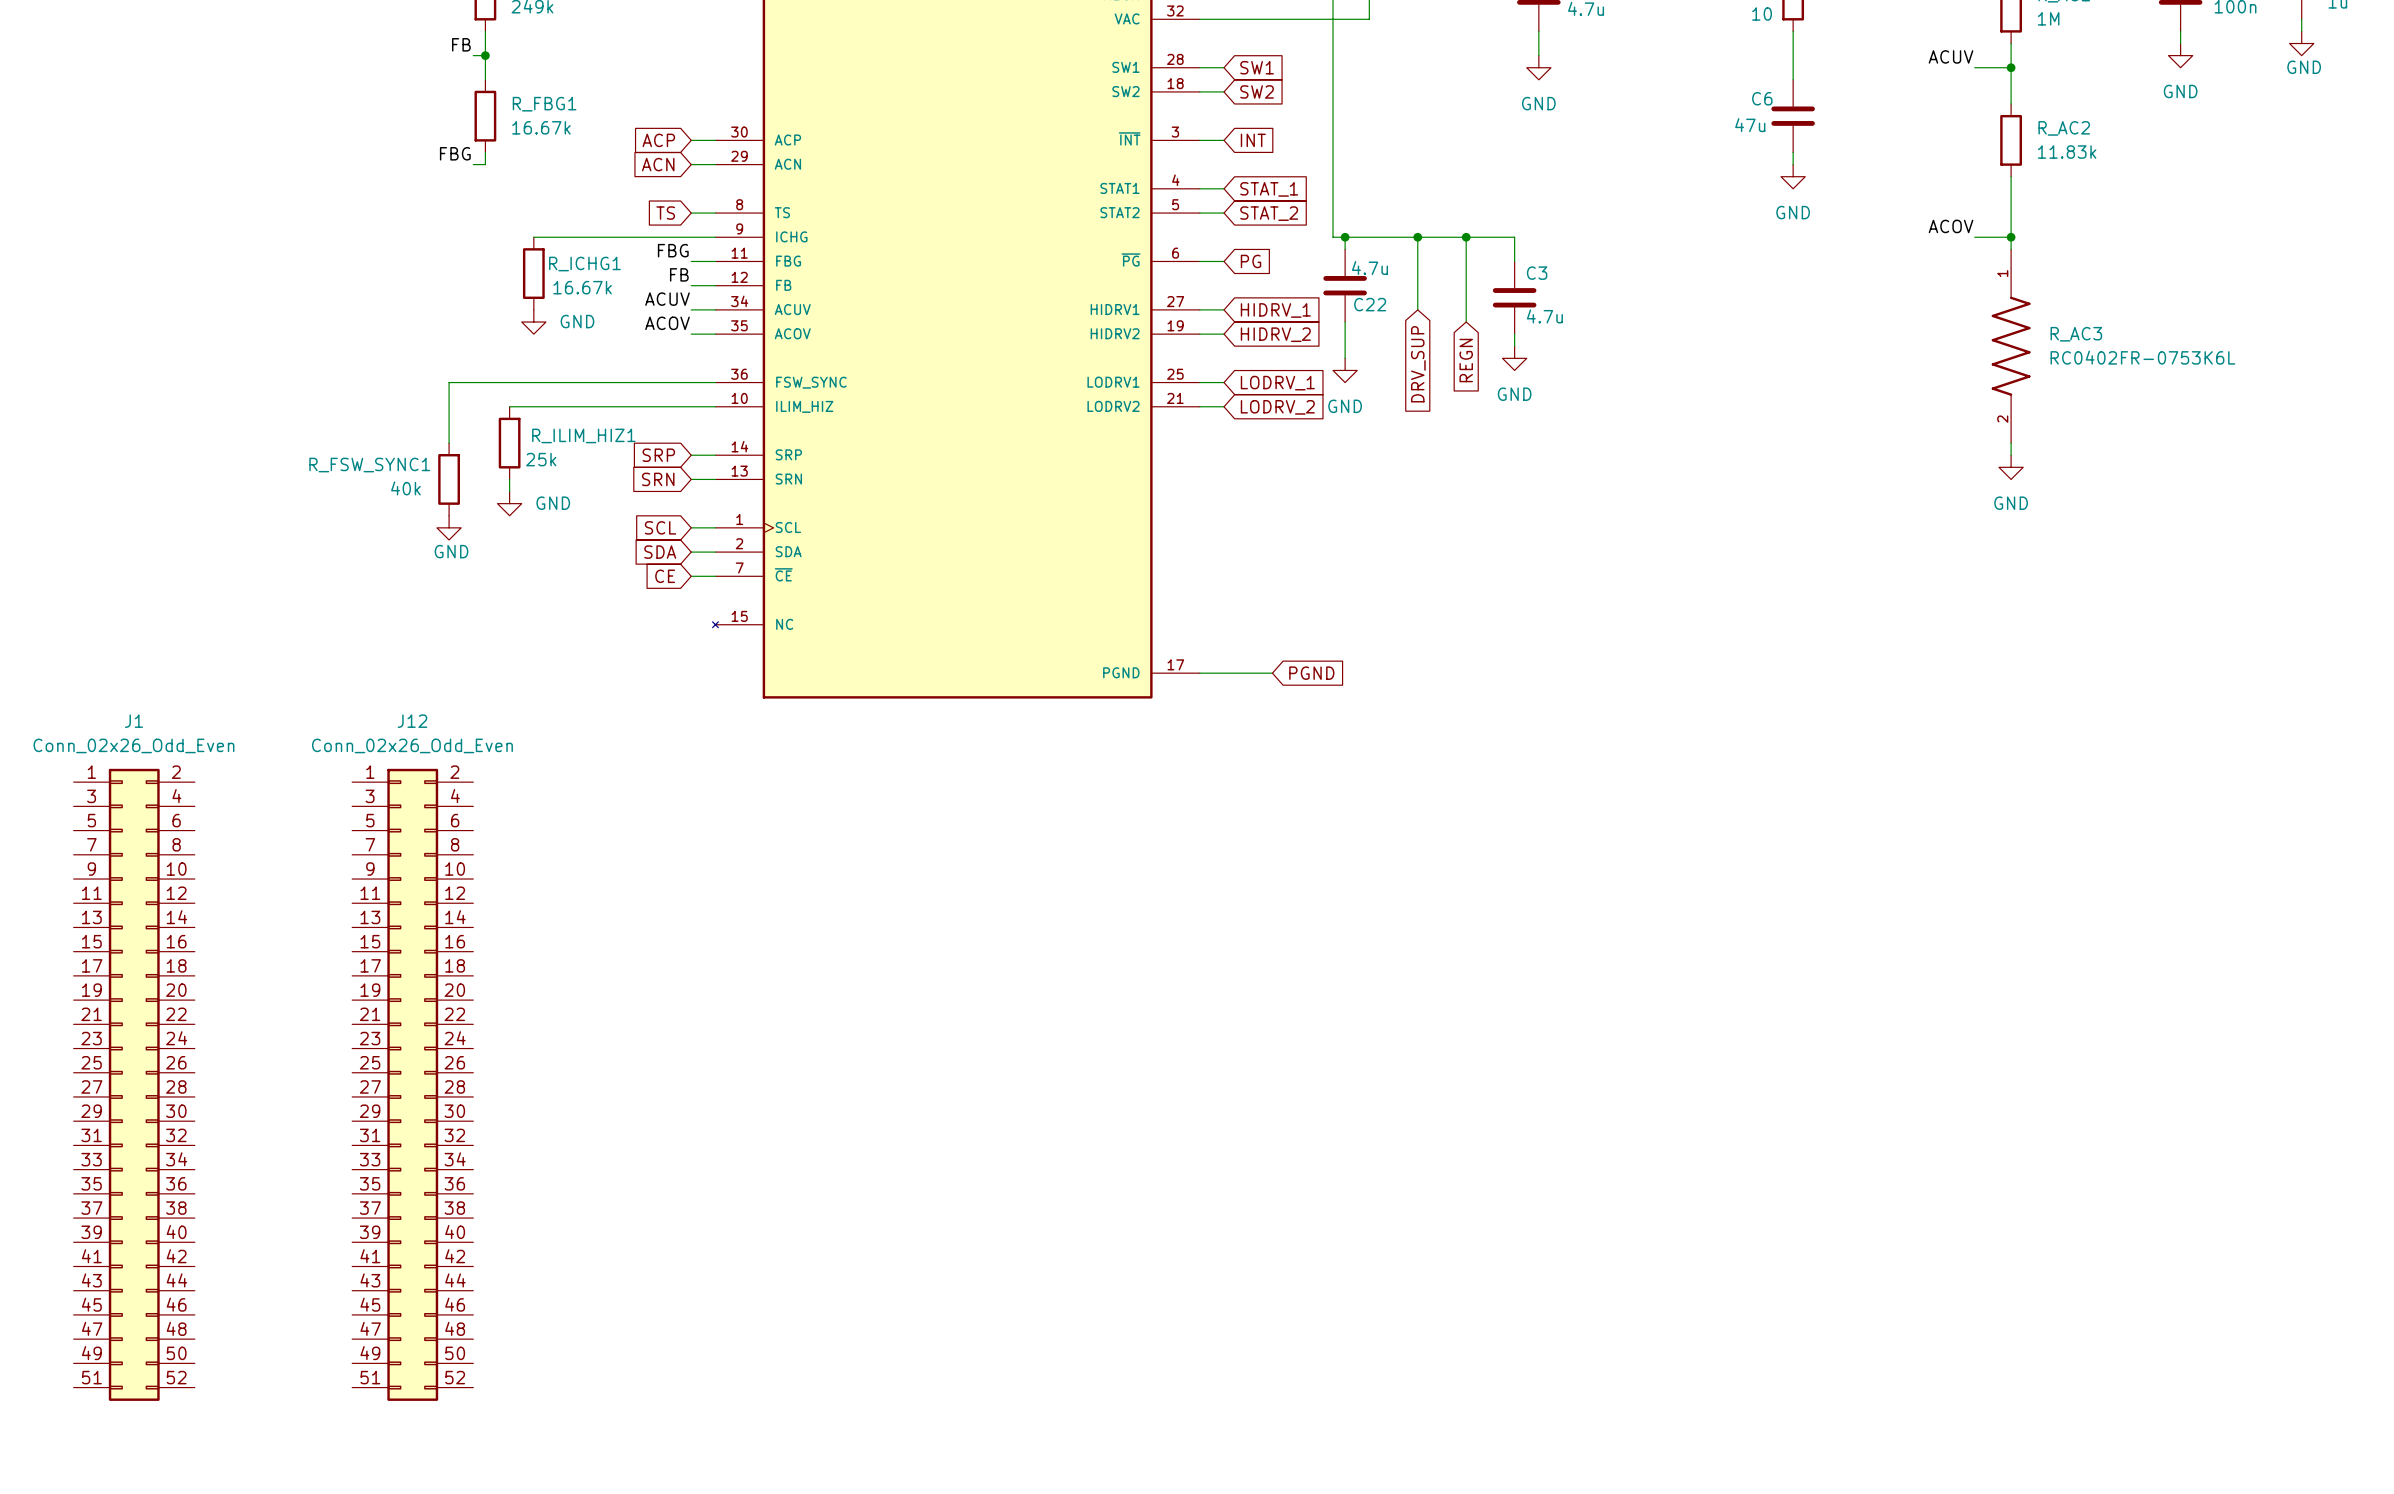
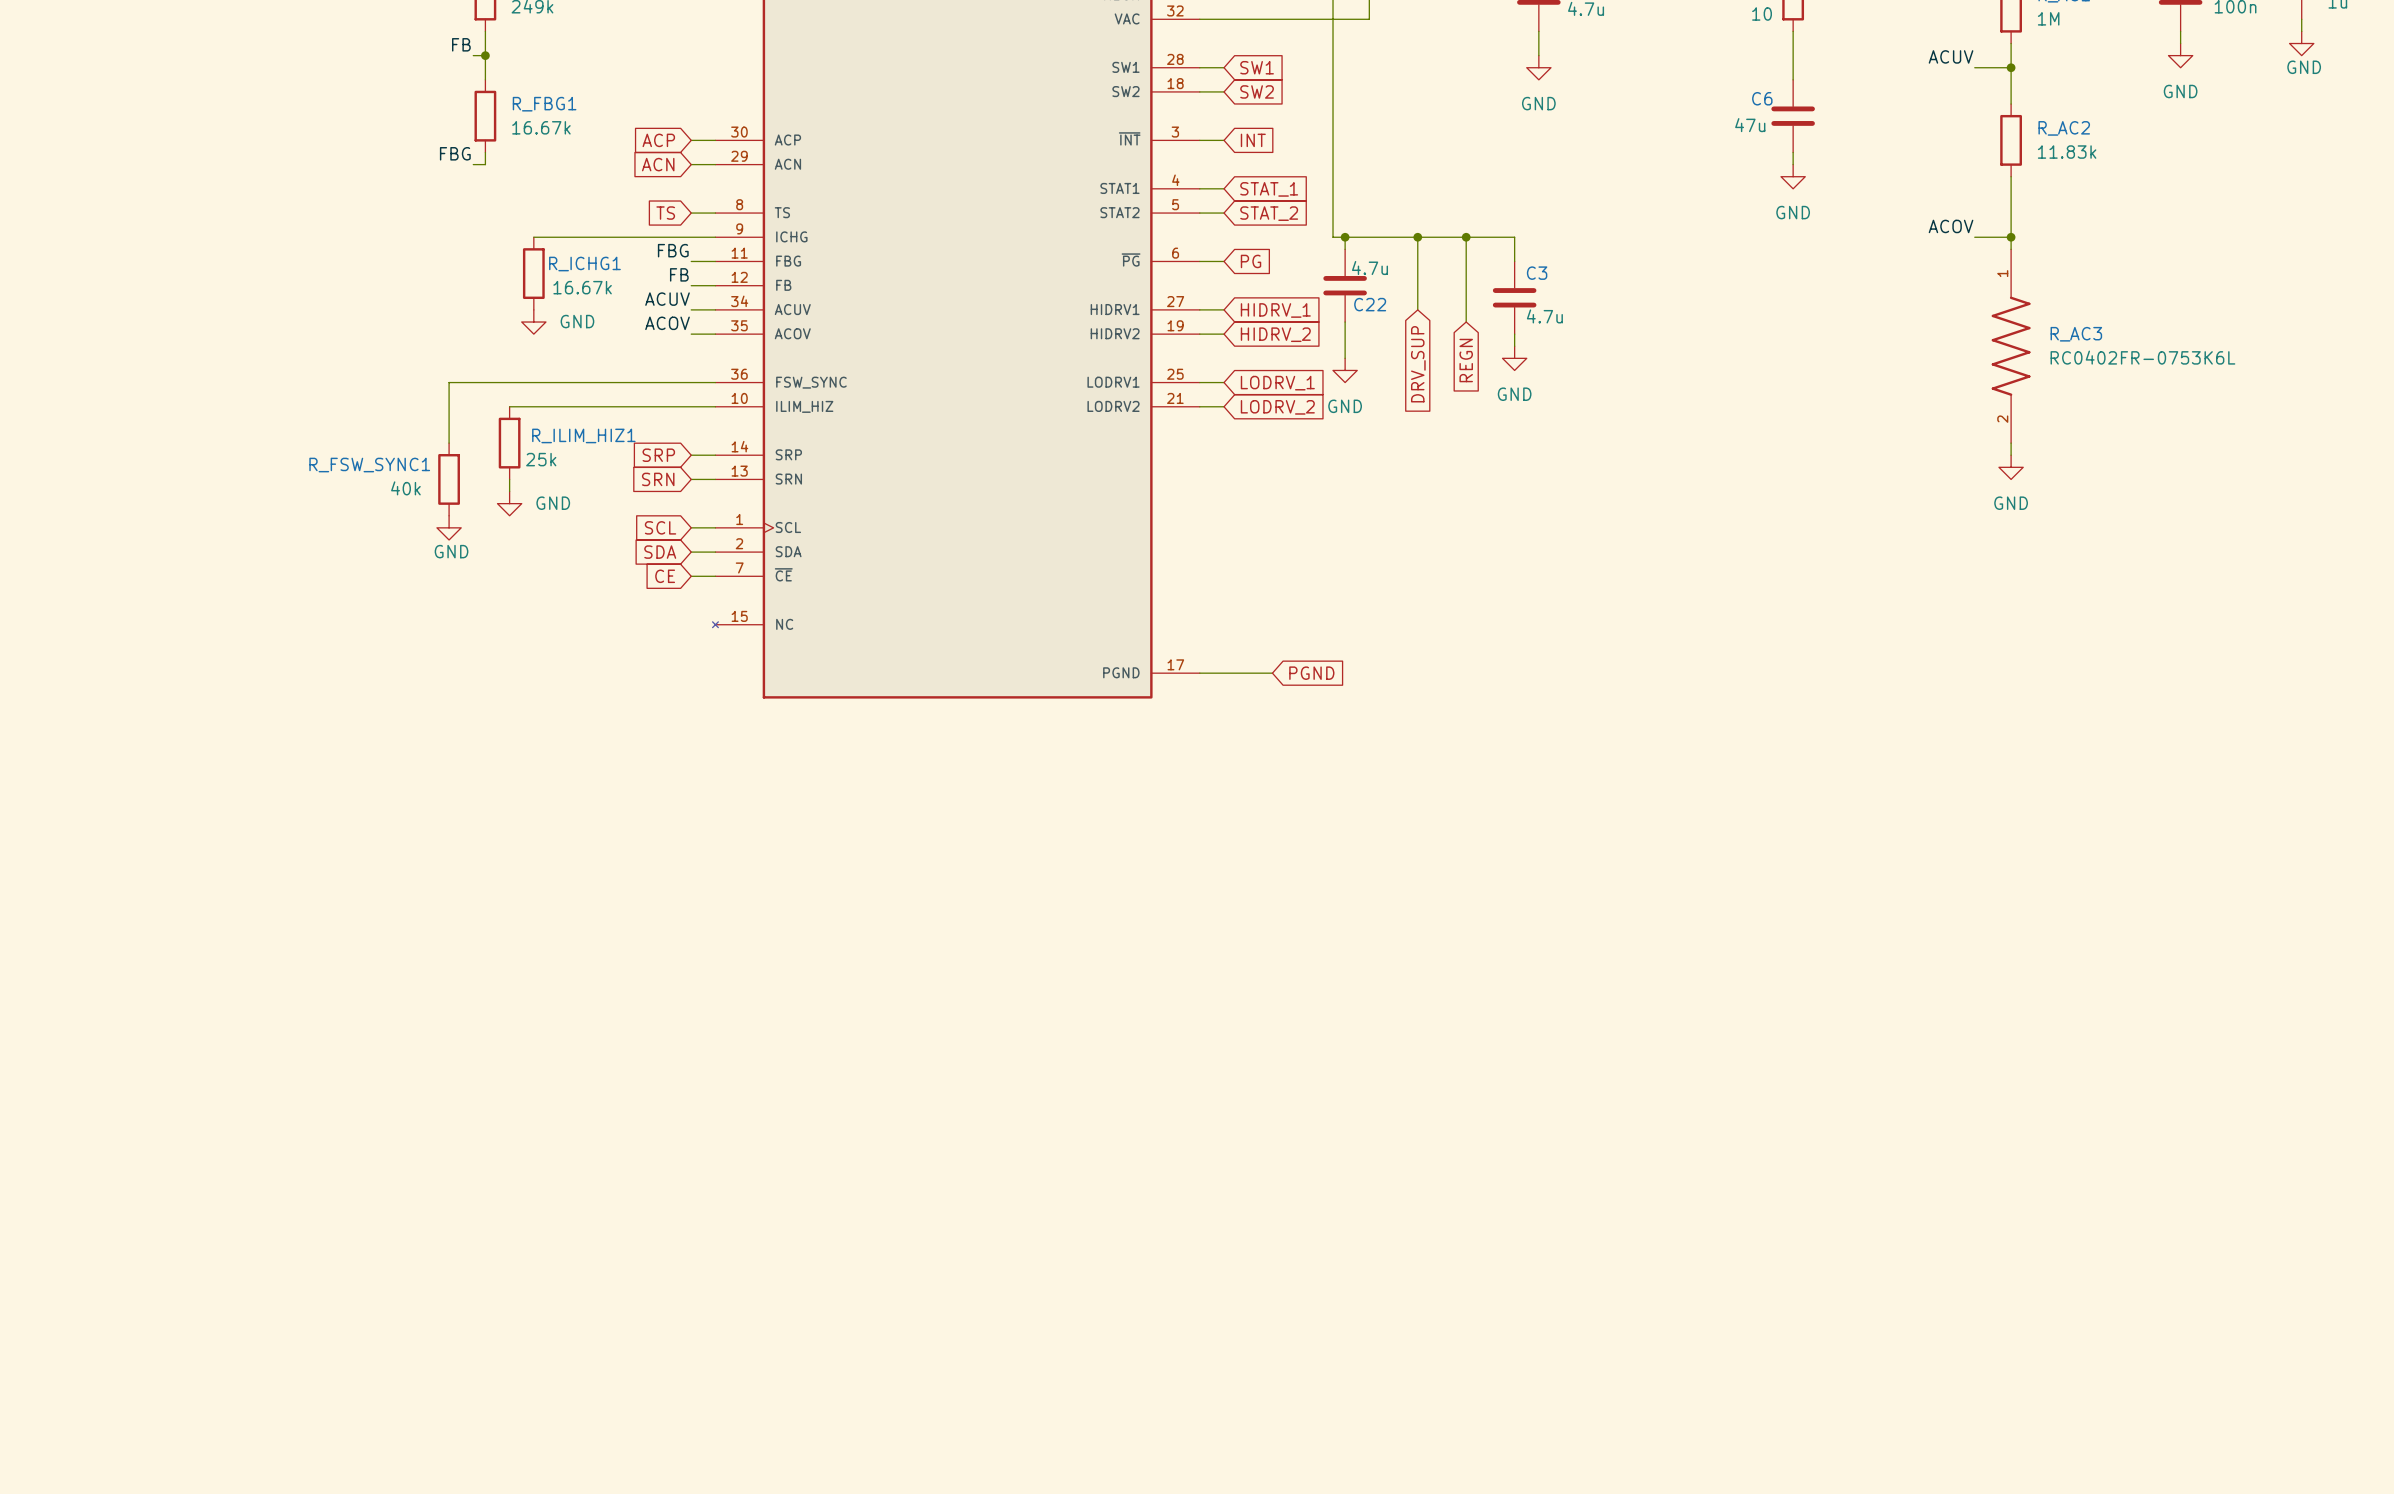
J1: Conn_02x26_Odd_Even (134, 1084) -> none
J12: Conn_02x26_Odd_Even (412, 1084) -> none

